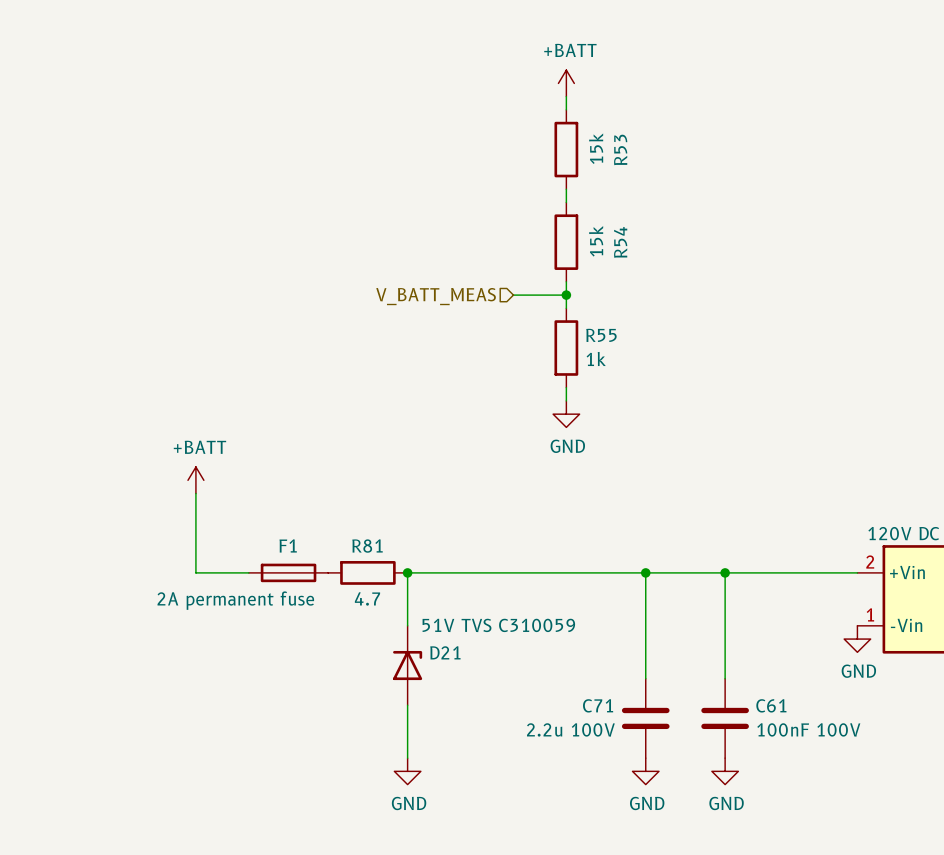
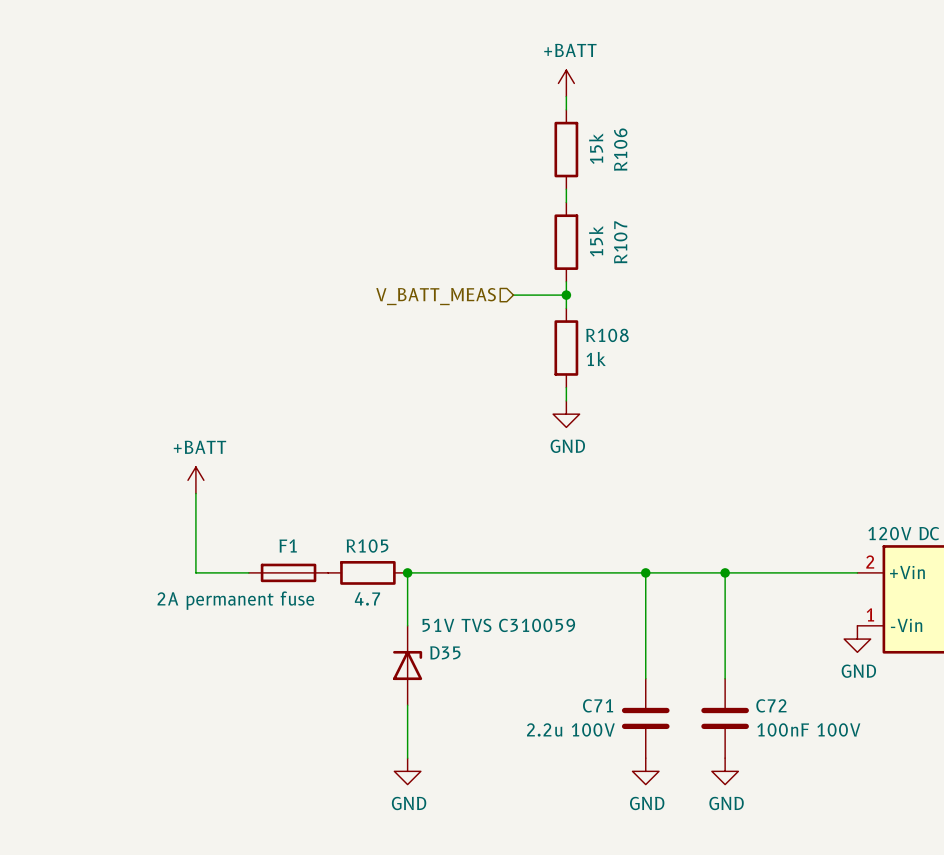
R53 name: R53 (620, 149) -> R106 (620, 149)
R54 name: R54 (620, 242) -> R107 (620, 242)
R55 name: R55 (601, 335) -> R108 (607, 335)
R81 name: R81 (367, 546) -> R105 (367, 546)
D21 name: D21 (445, 652) -> D35 (445, 652)
C61 name: C61 (771, 705) -> C72 (771, 705)

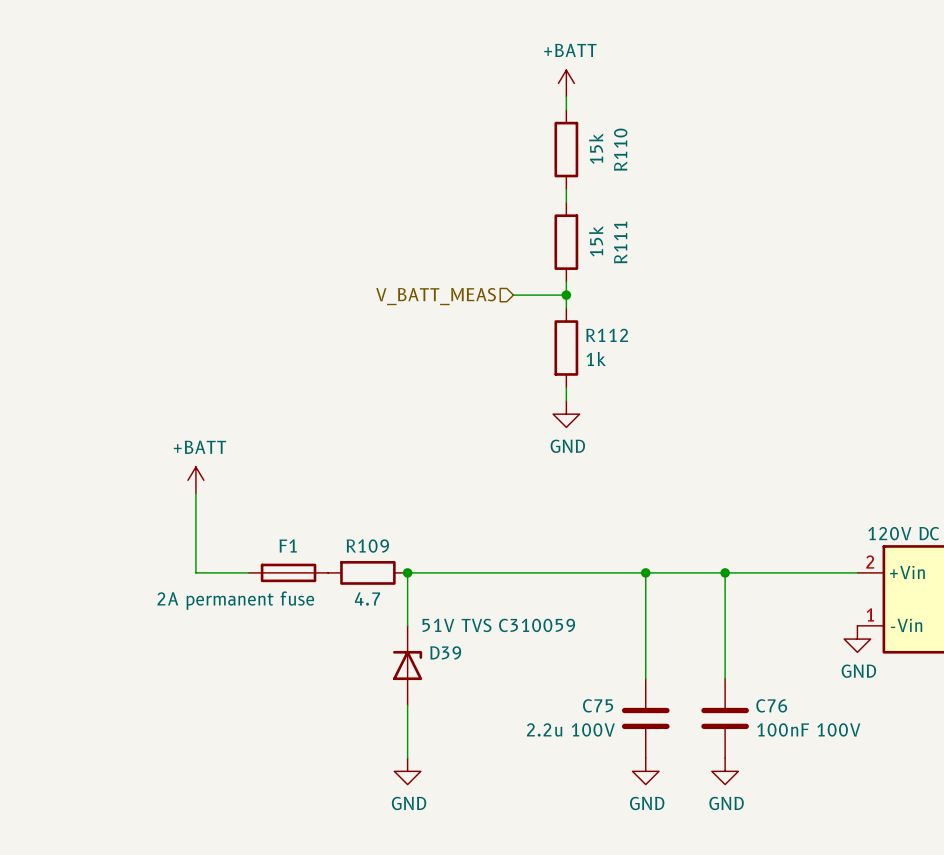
R106 name: R106 (620, 149) -> R110 (620, 149)
R107 name: R107 (620, 242) -> R111 (620, 242)
R108 name: R108 (607, 335) -> R112 (607, 335)
R105 name: R105 (367, 546) -> R109 (367, 546)
D35 name: D35 (445, 652) -> D39 (445, 652)
C71 name: C71 (598, 705) -> C75 (598, 705)
C72 name: C72 (771, 705) -> C76 (771, 705)

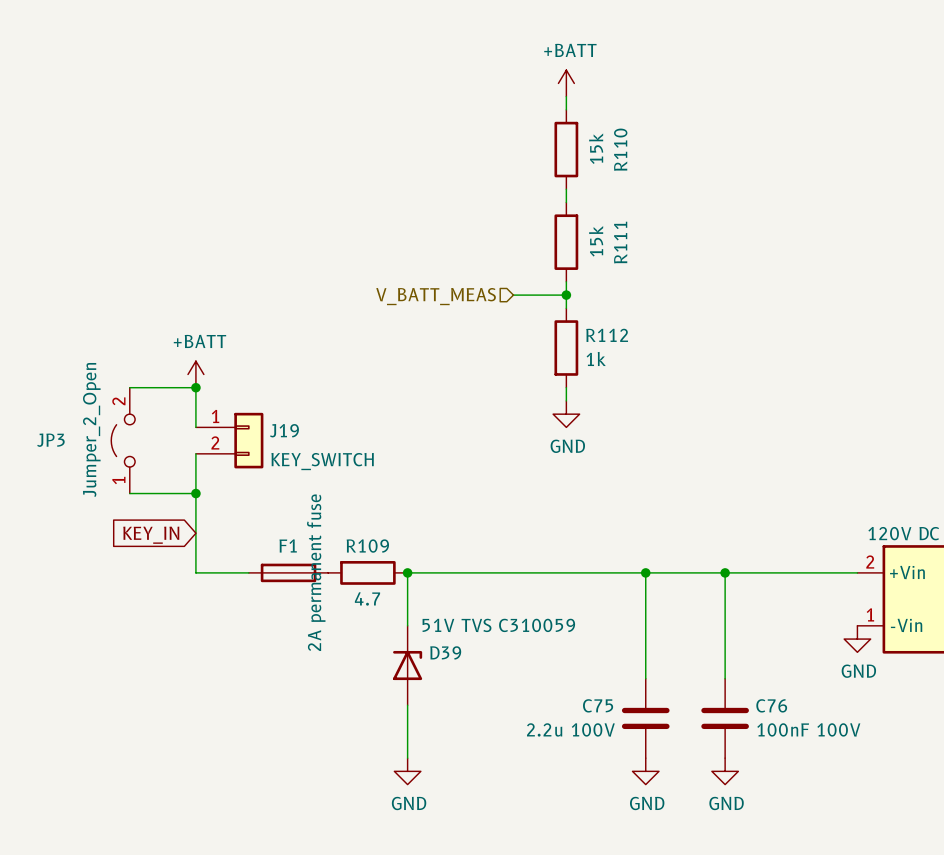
wire: none -> (129, 387) (195, 387) (195, 427)
junction: none -> (195, 387)
JP3: none -> Jumper_2_Open (123, 440)
J19: none -> KEY_SWITCH (229, 440)
wire: none -> (195, 453) (195, 493) (129, 493)
power symbol position: +BATT (195, 480) -> +BATT (195, 374)
junction: none -> (195, 493)
global label: none -> KEY_IN (151, 535)
F1 value rotation: 0° (235, 600) -> 90° counterclockwise (316, 572)

